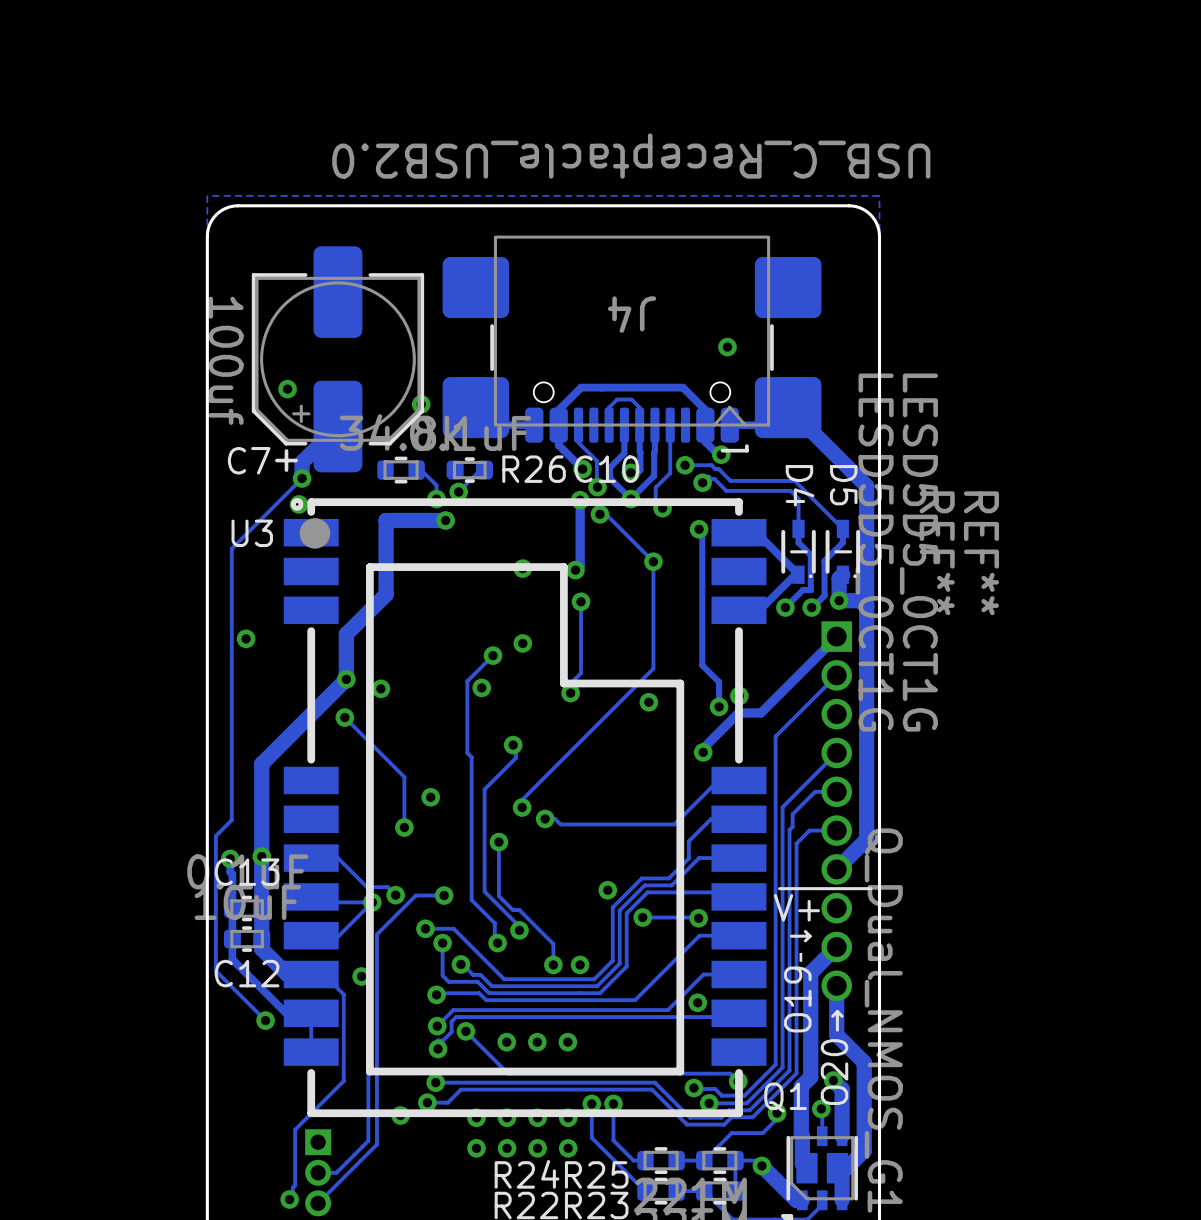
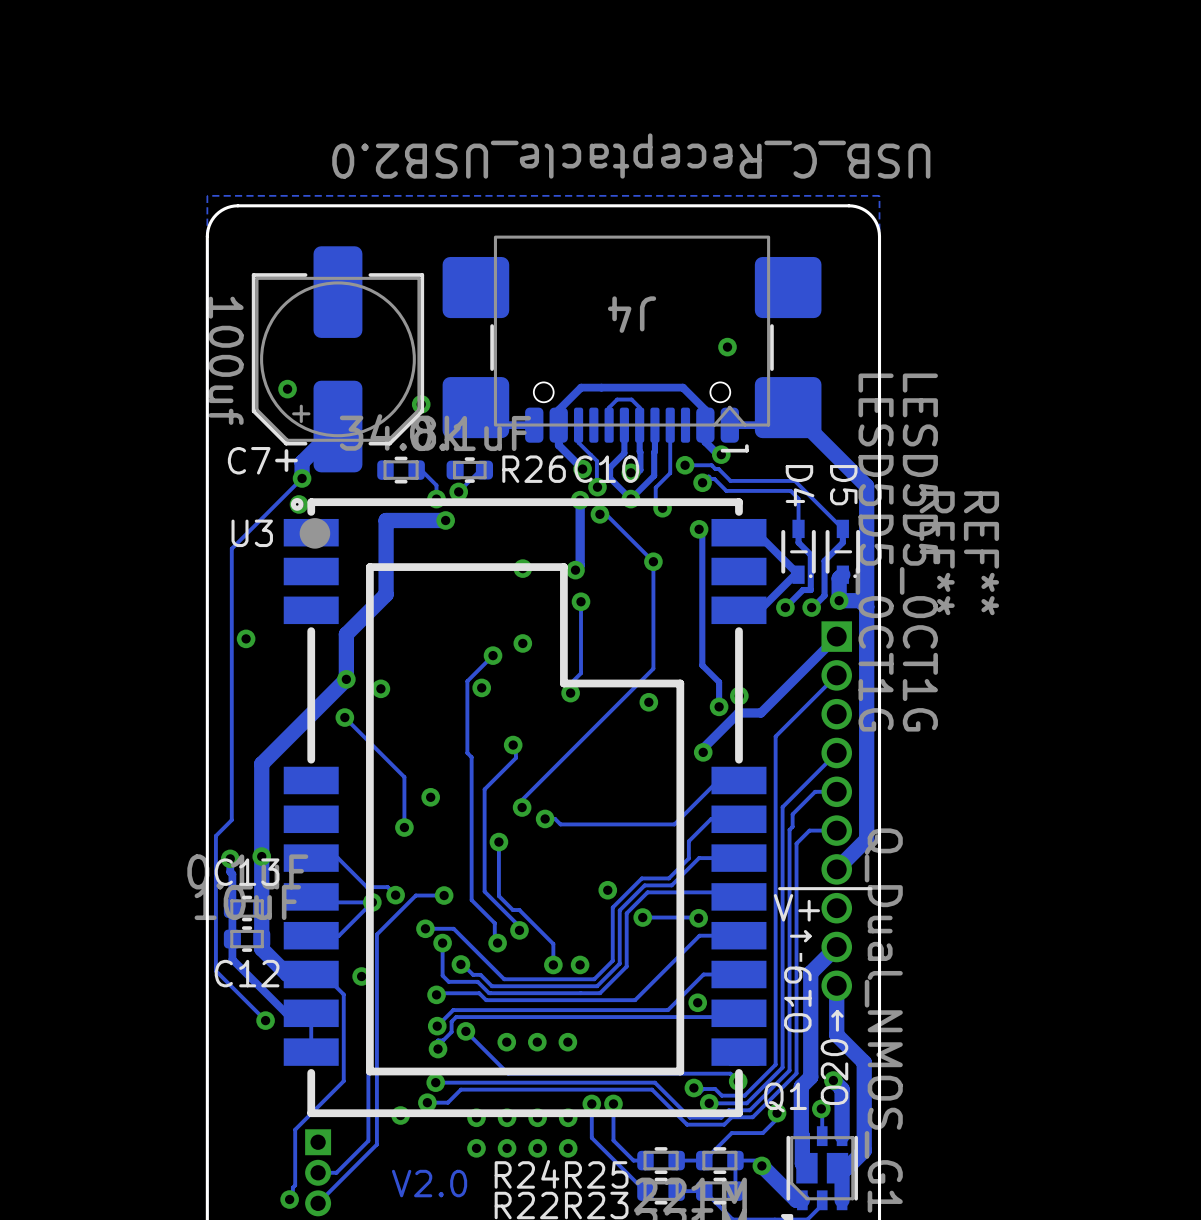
text: none -> V2.0 (429, 1183)

